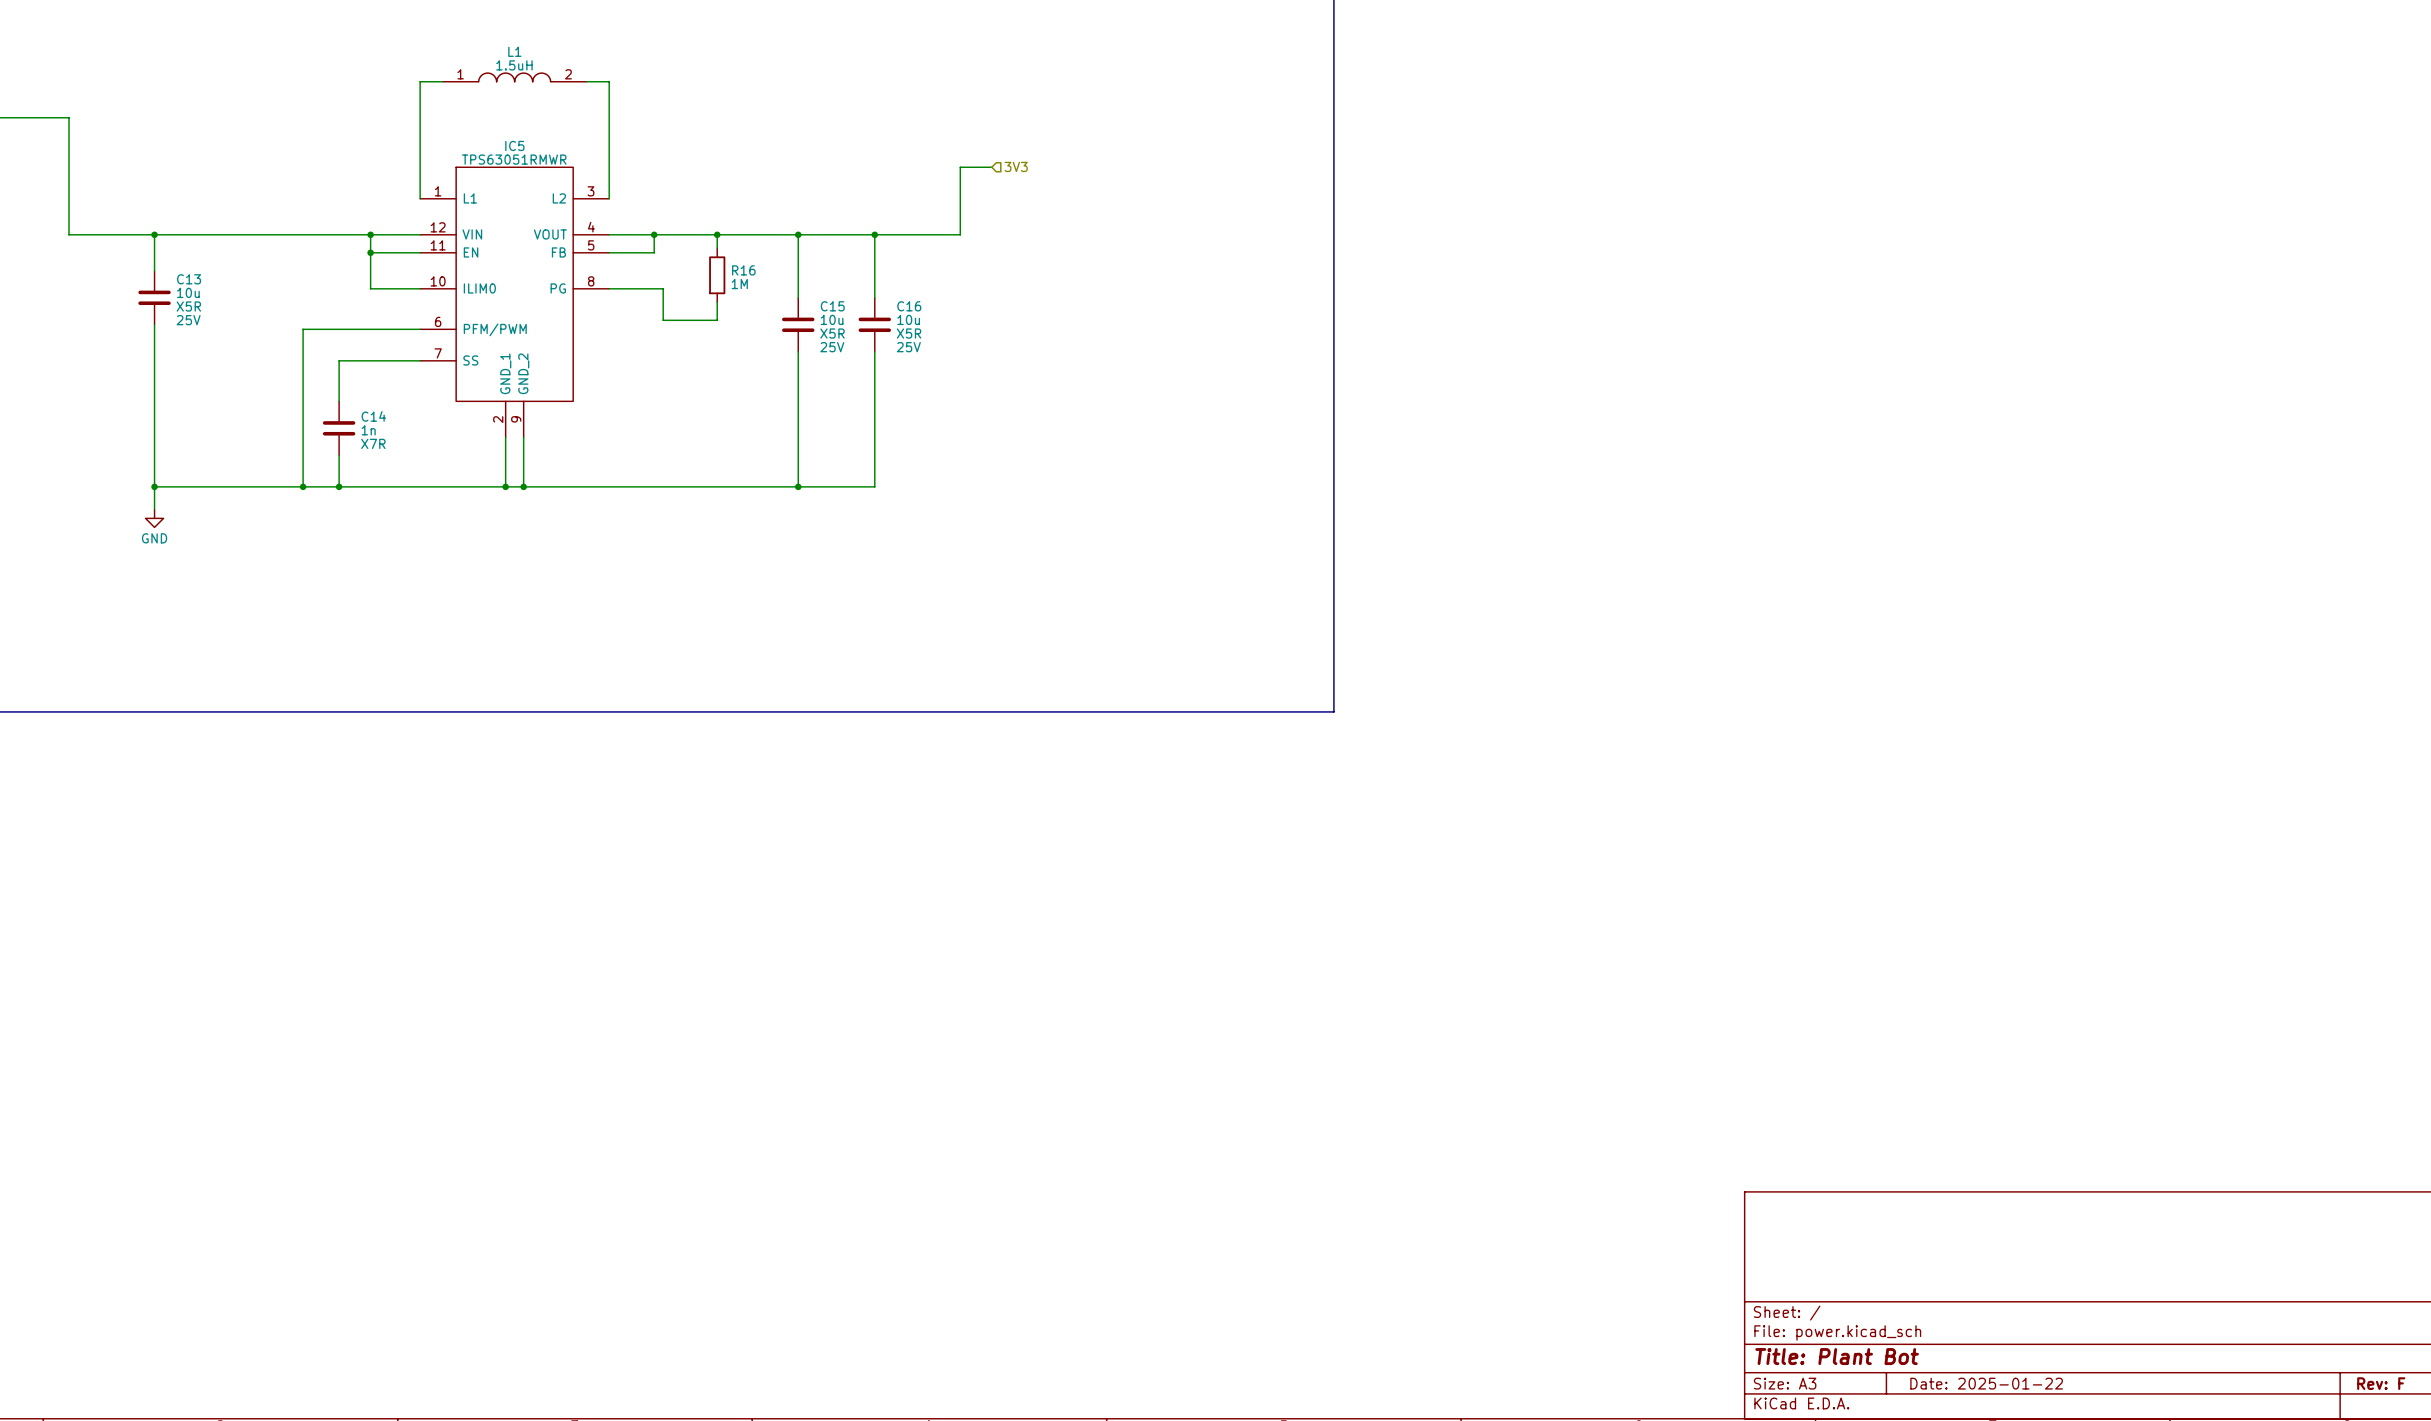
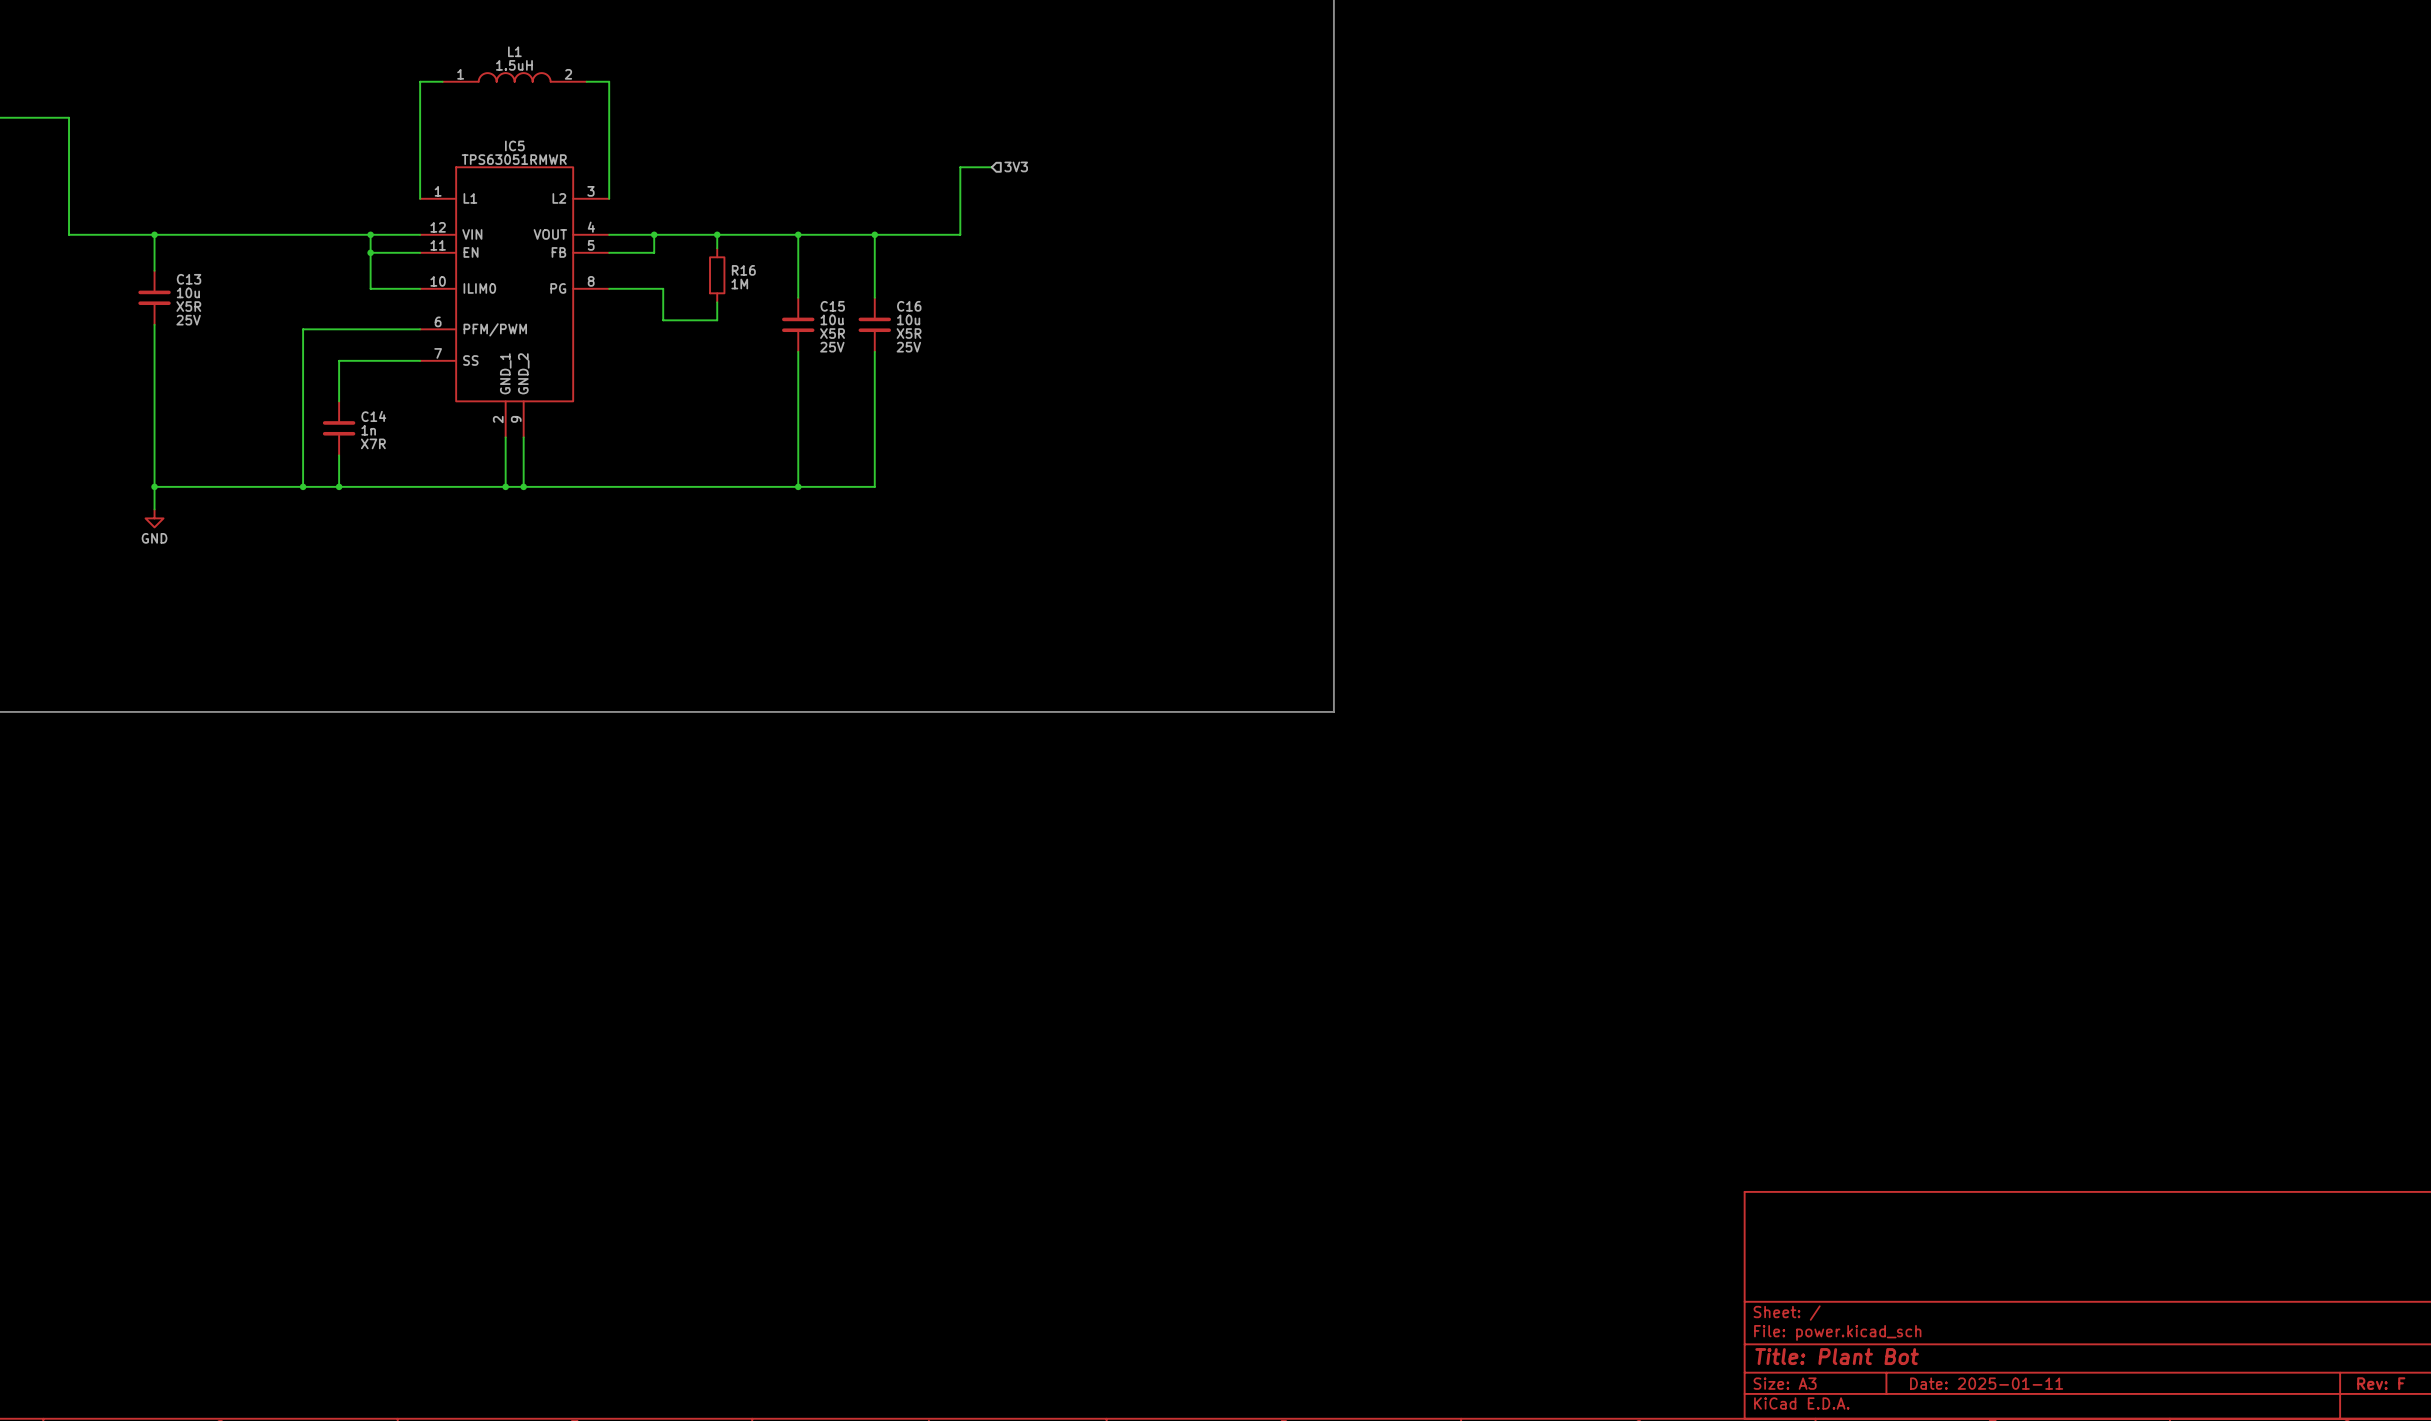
title block: Date: 2025-01-22 (1986, 1383) -> Date: 2025-01-11 (1986, 1383)

